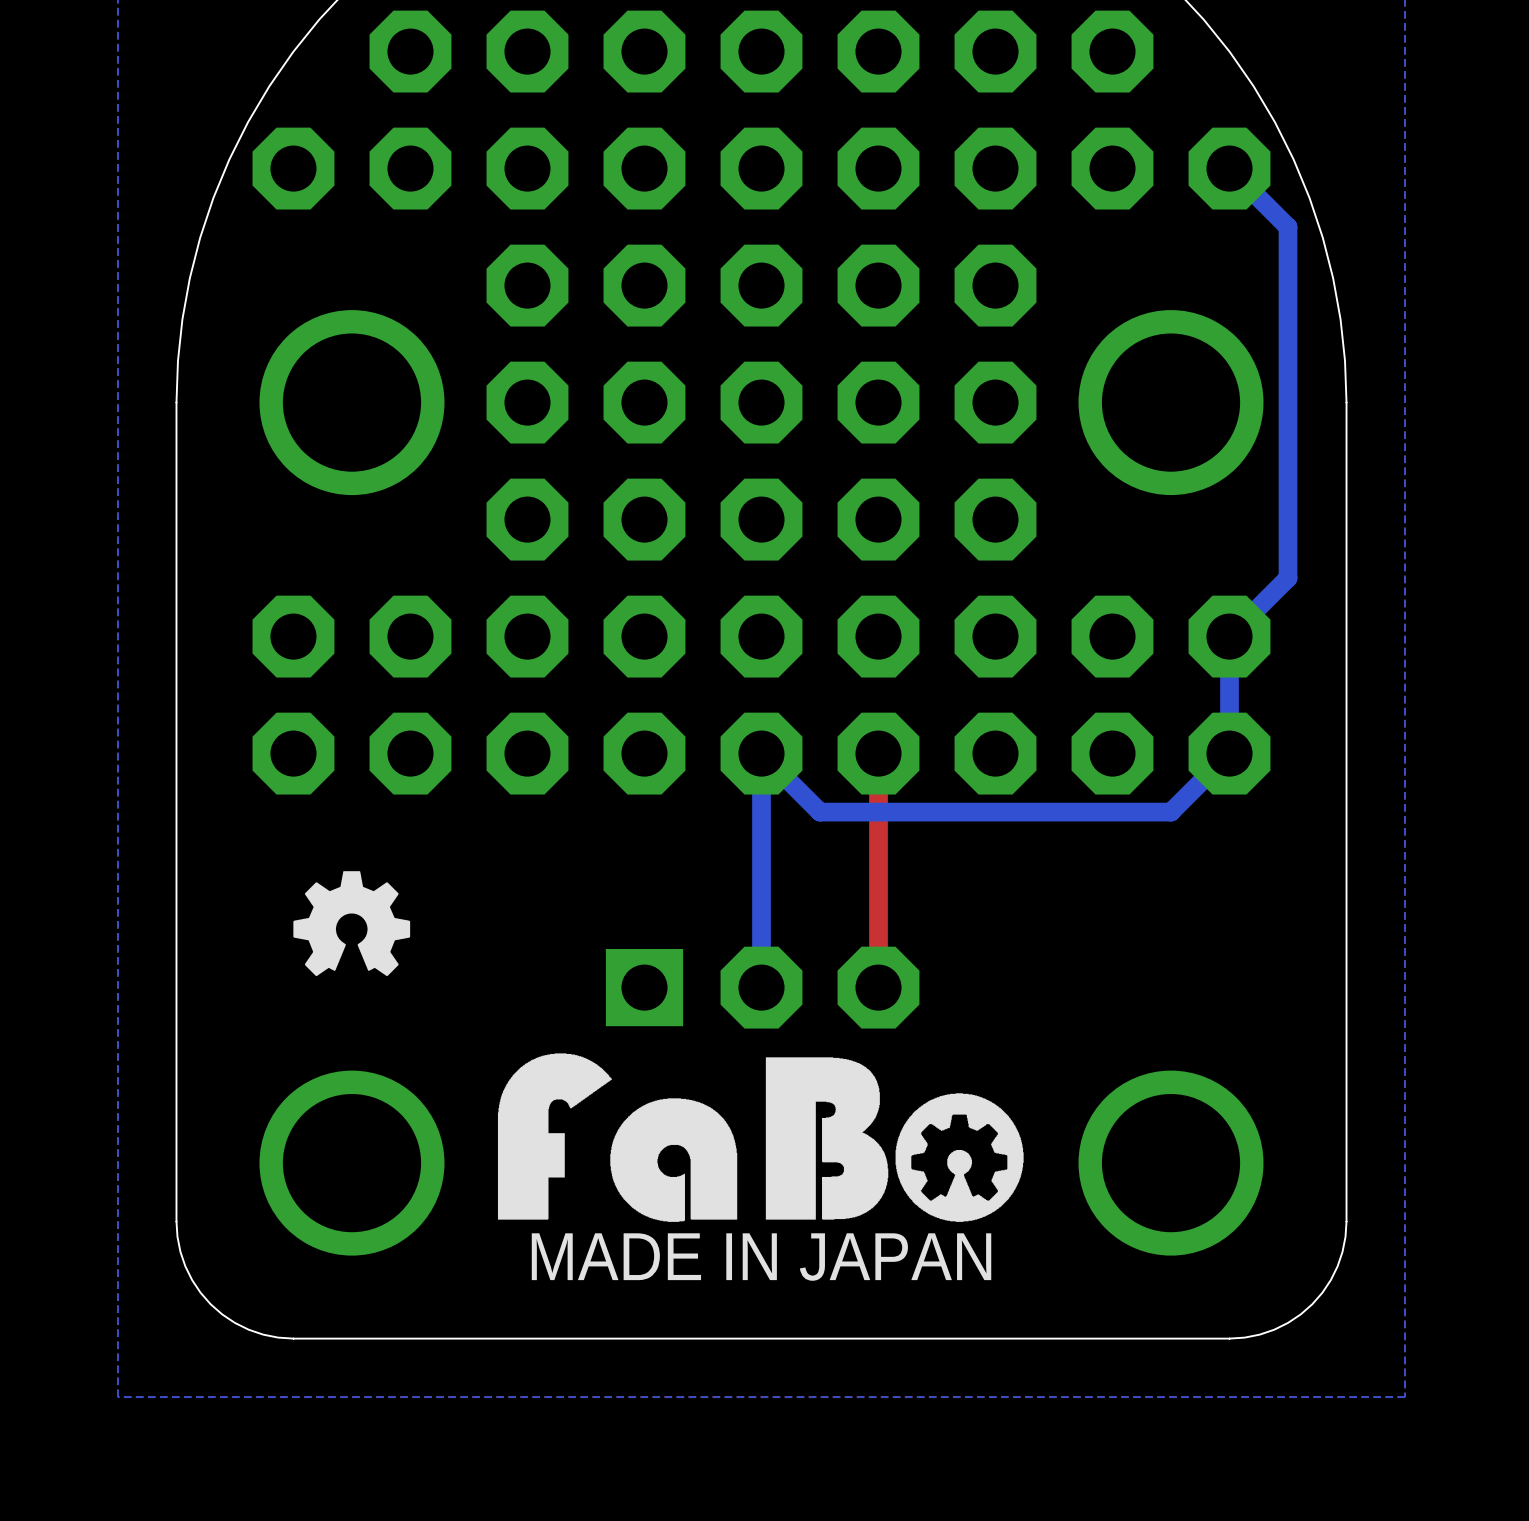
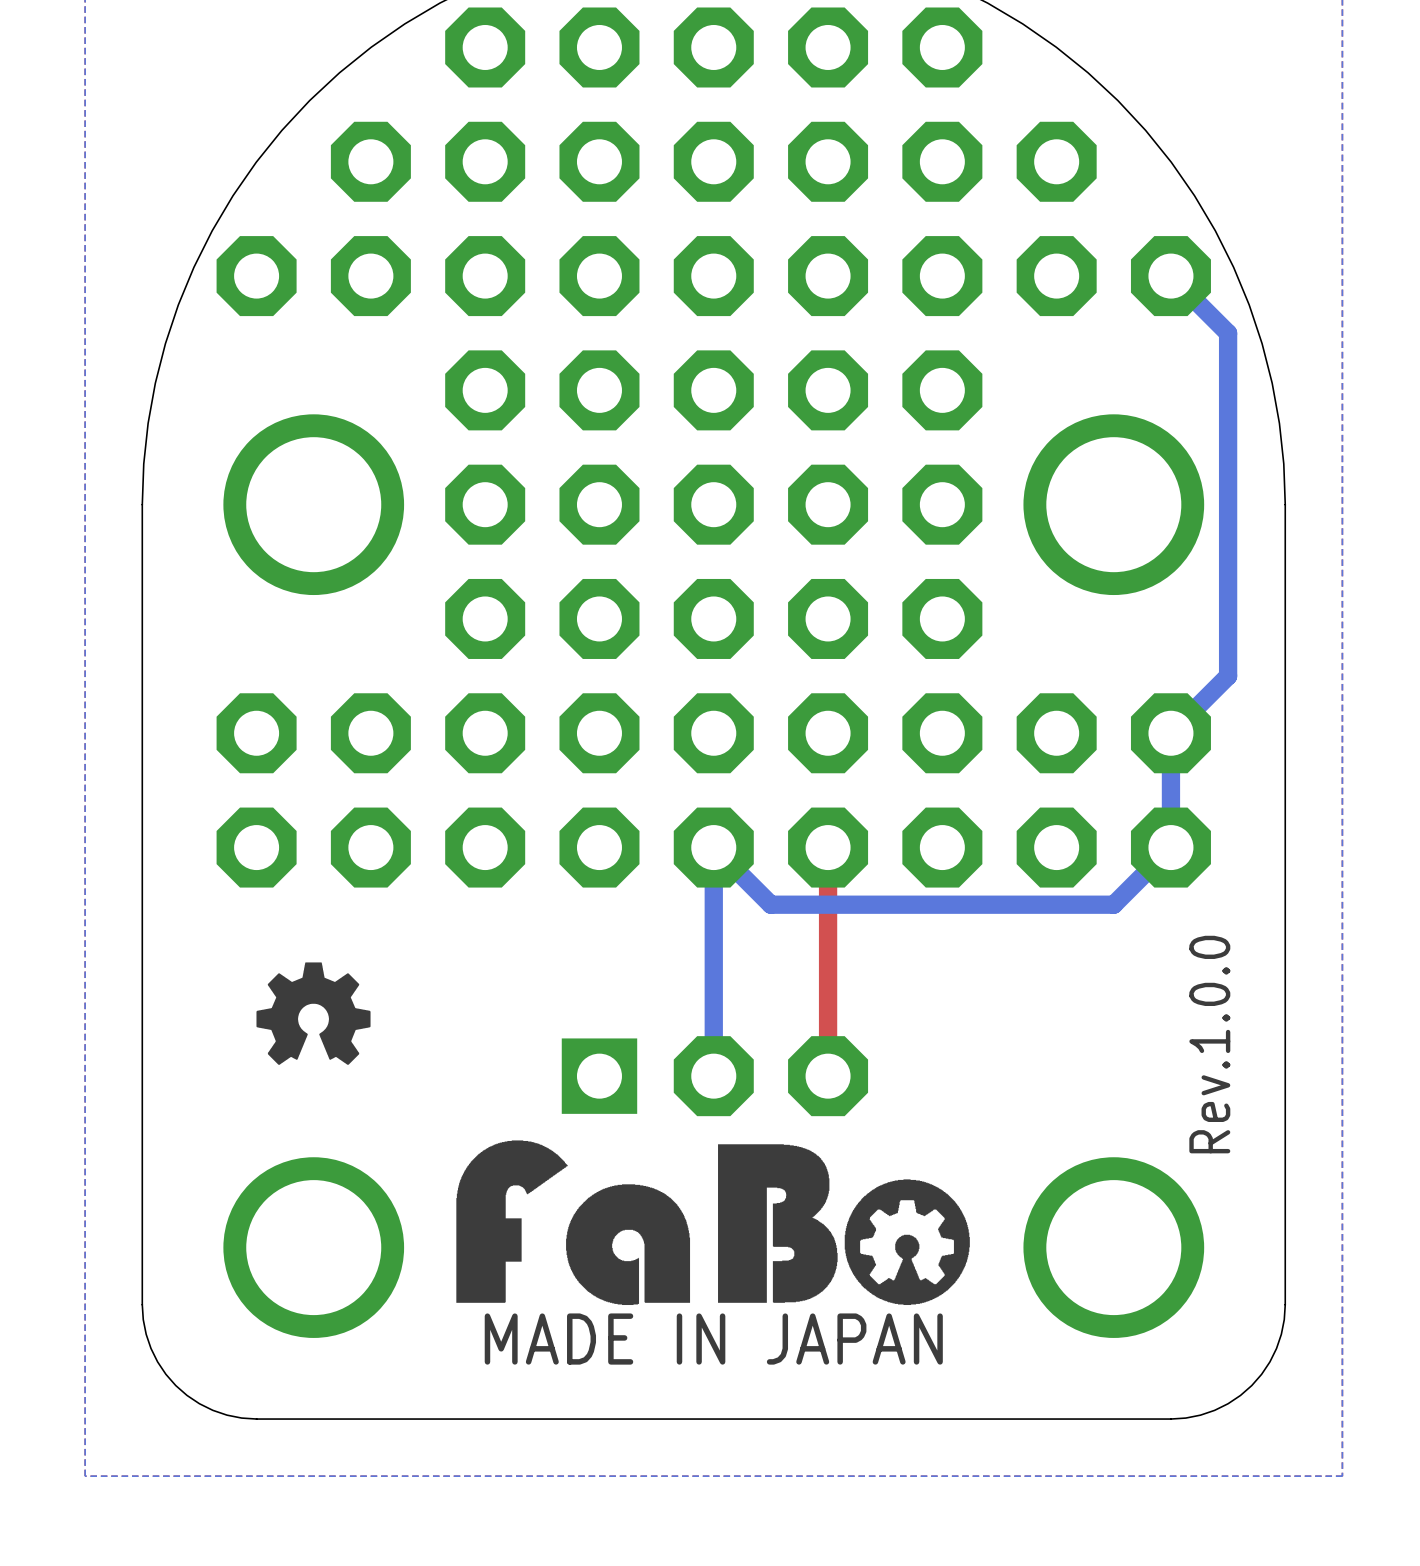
text: none -> Rev.1.0.0 (1209, 1044)

